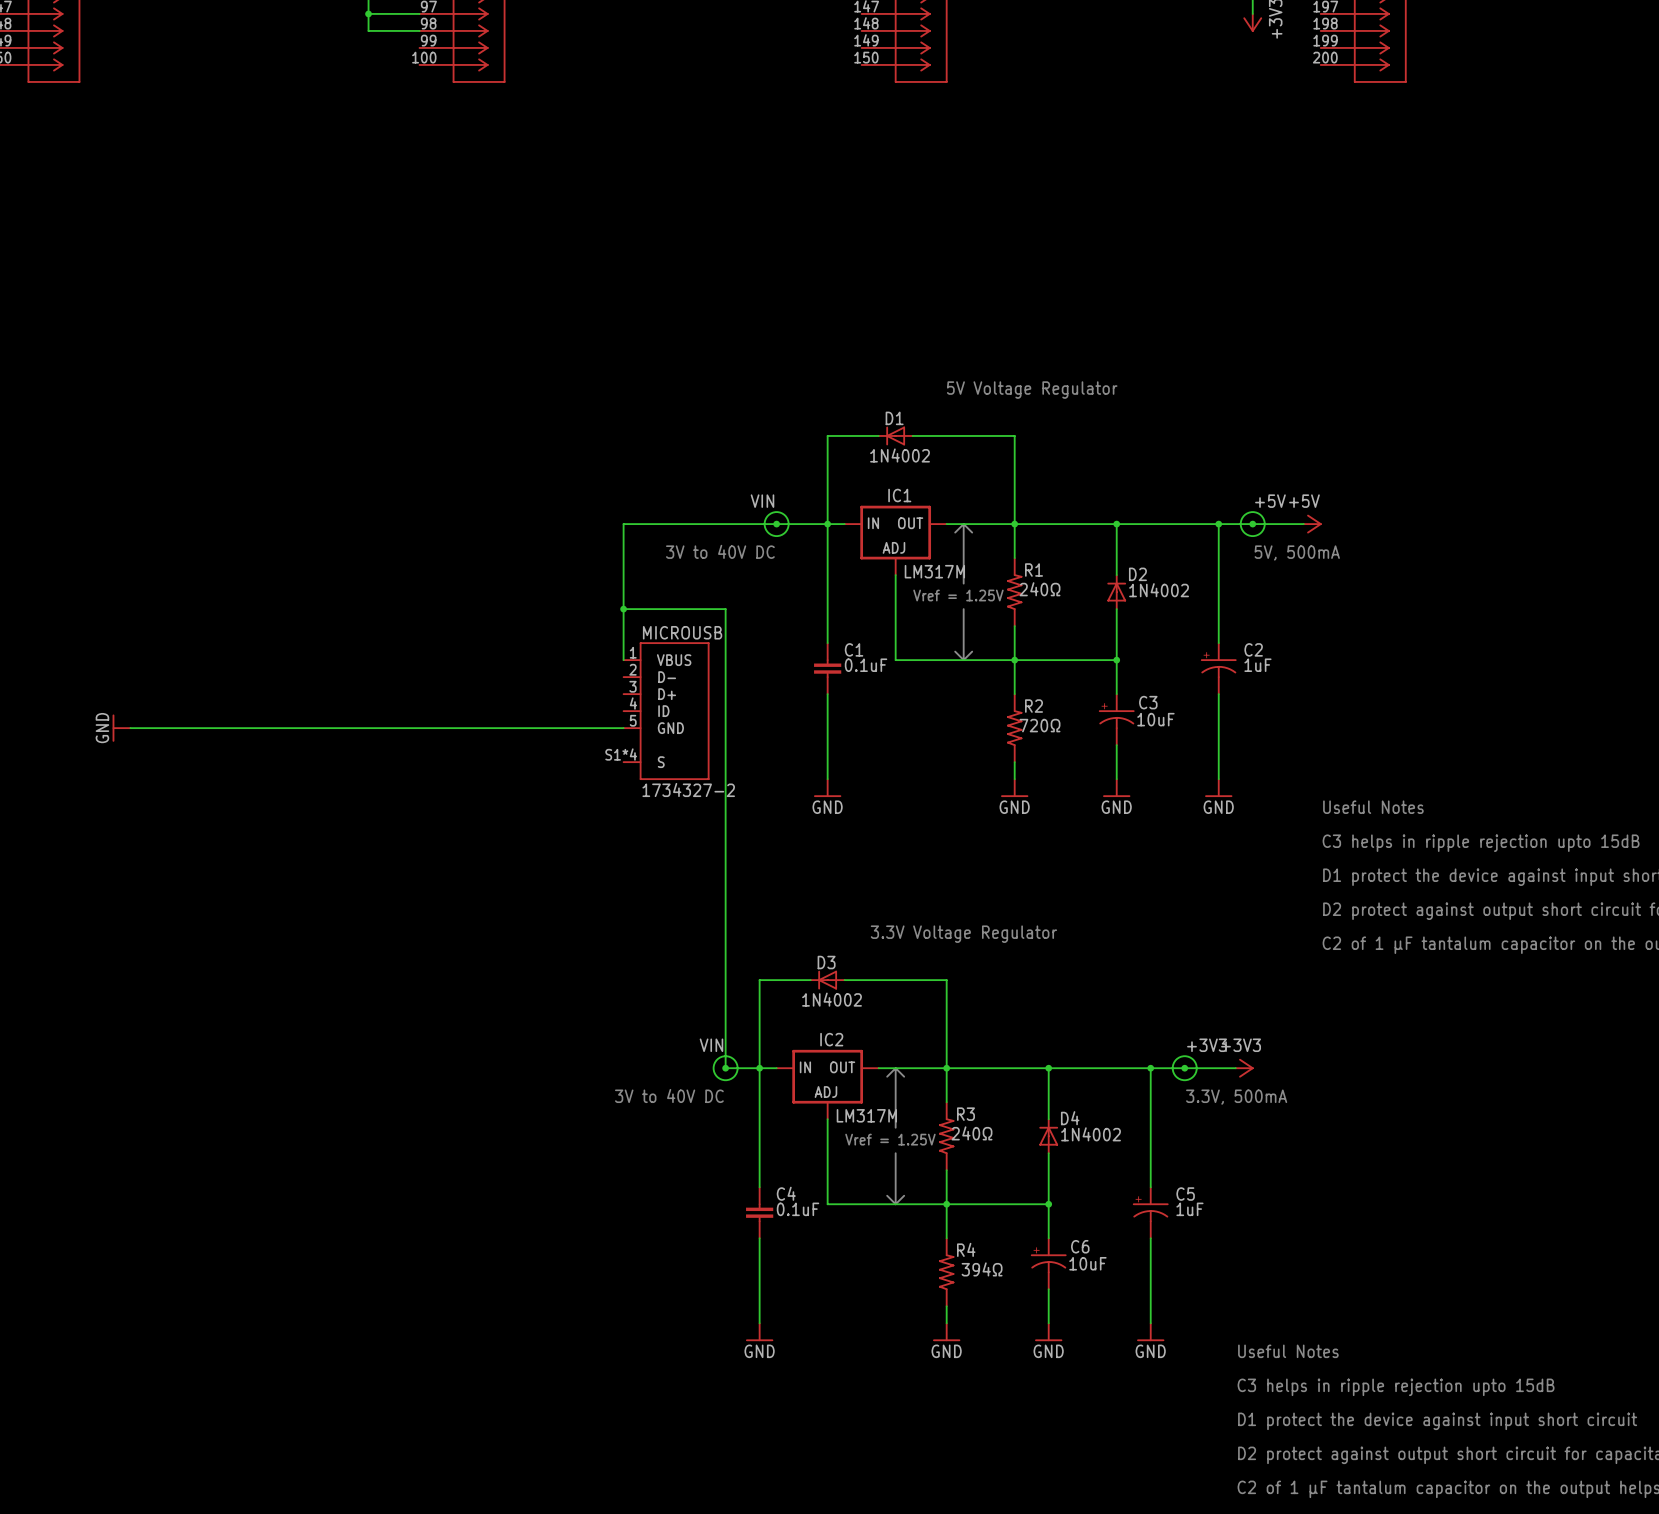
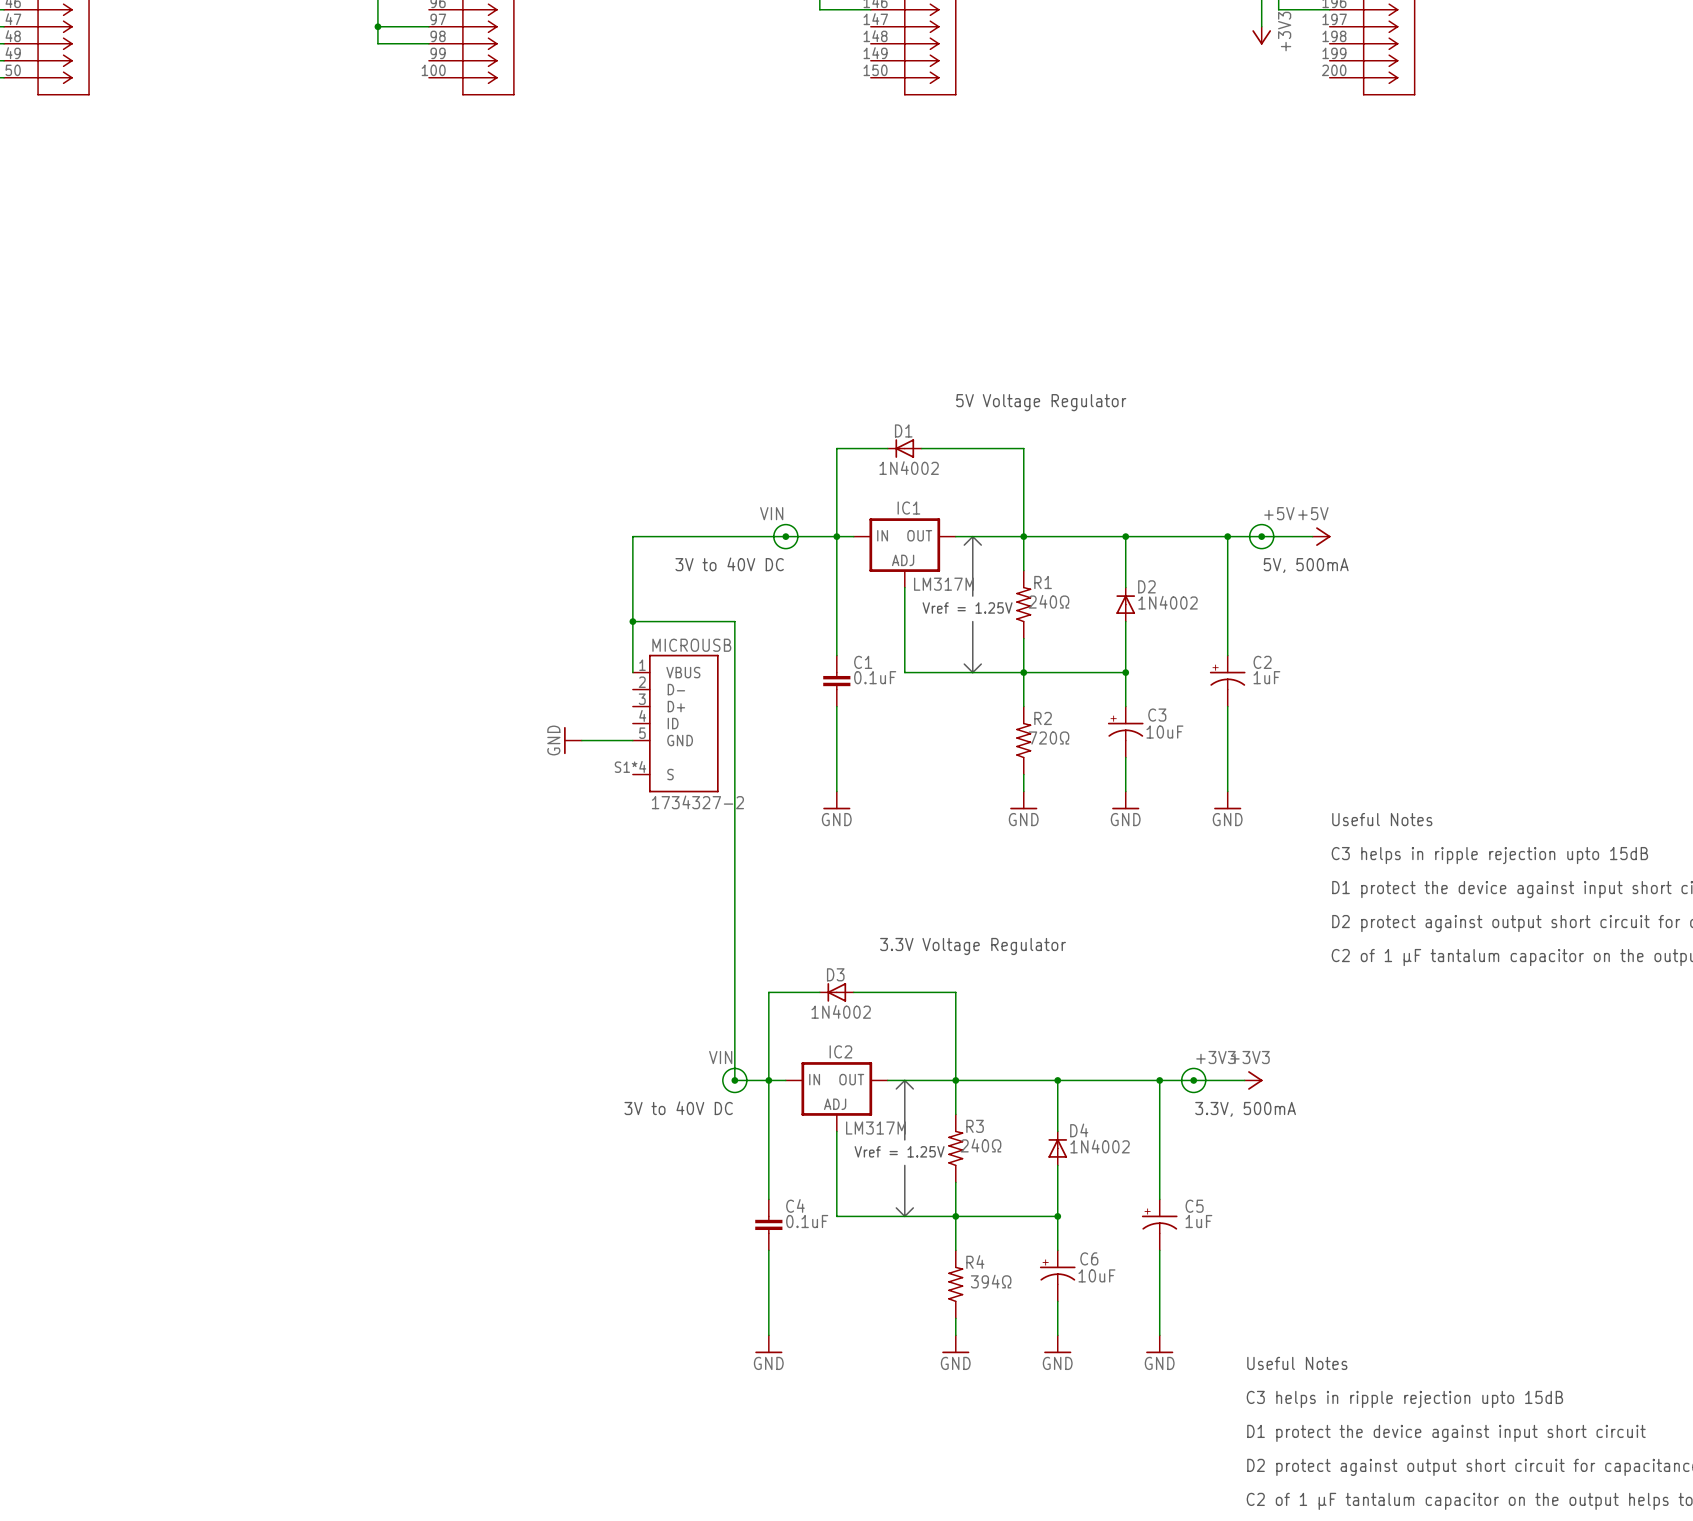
power symbol: GND (121, 728) -> none
wire: (130, 728) (572, 728) -> none
power symbol: none -> GND (572, 740)

